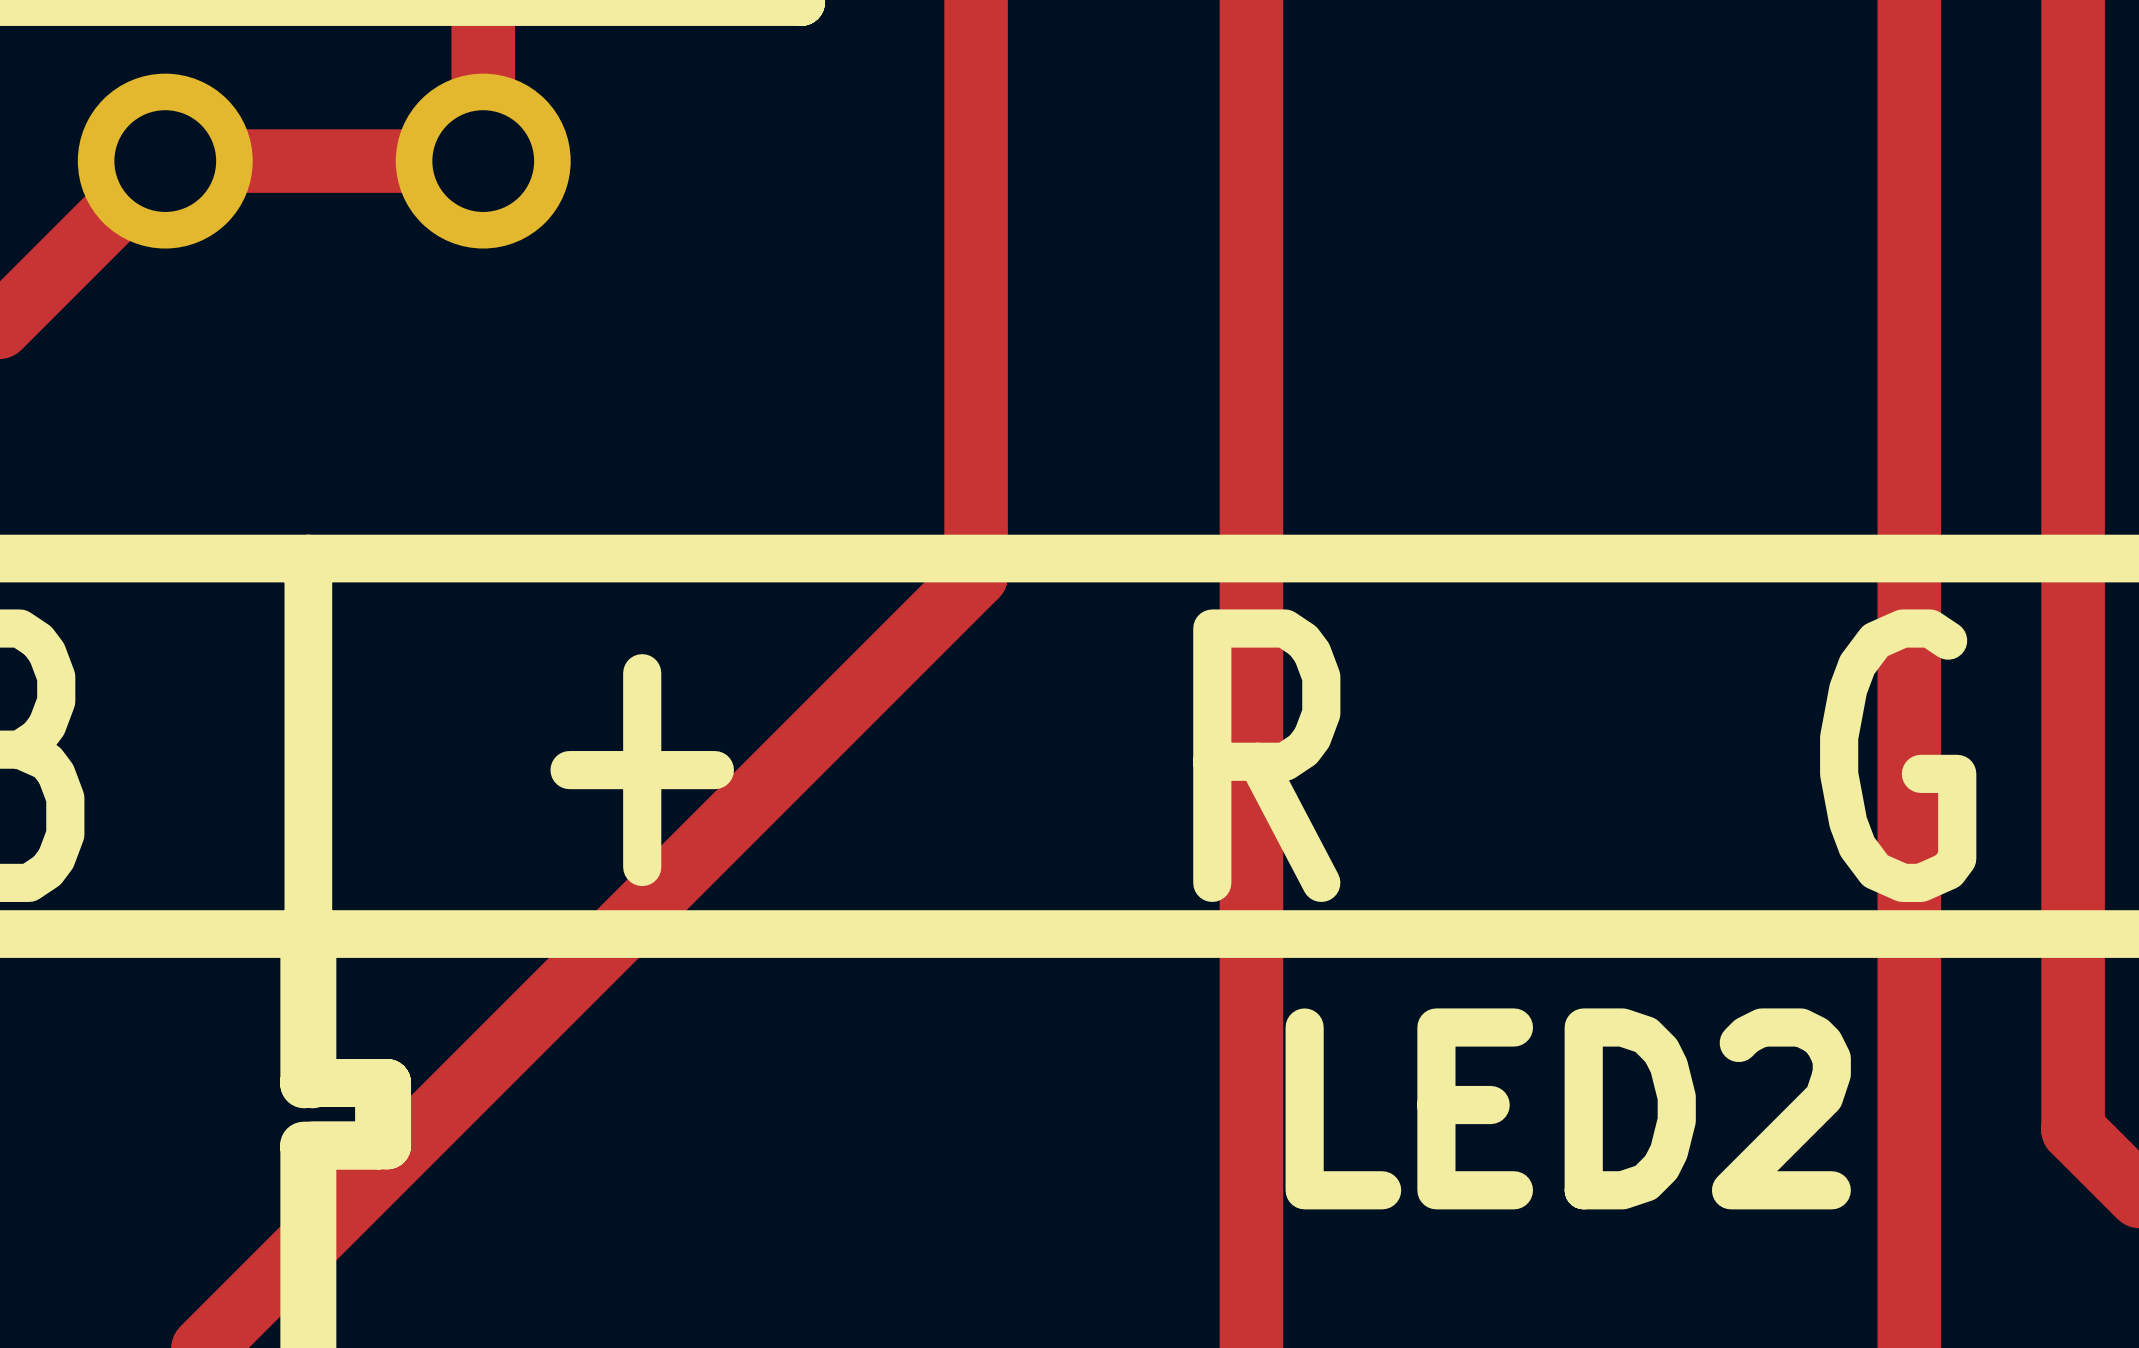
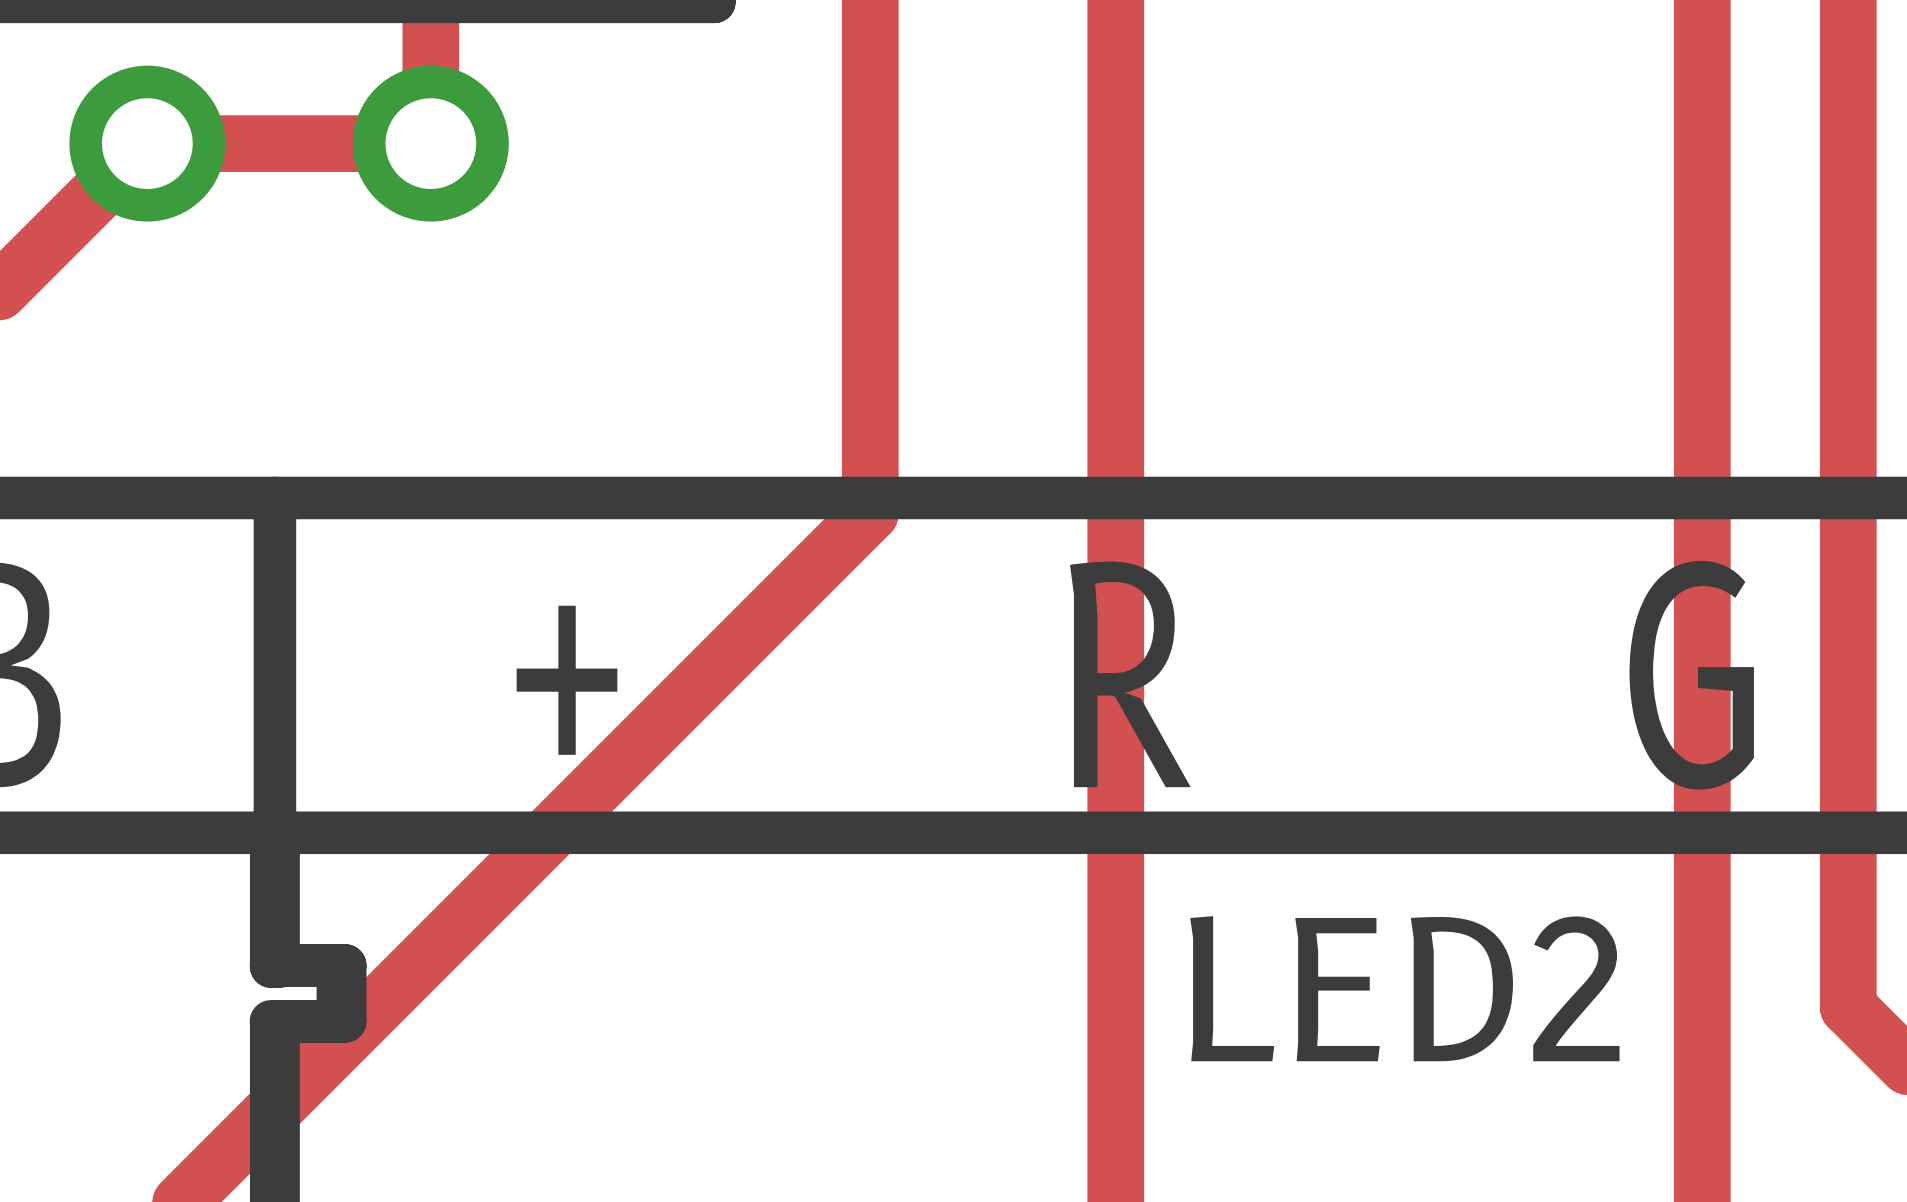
LED2 name position: LED2 (1568, 1108) -> LED2 (1404, 988)

